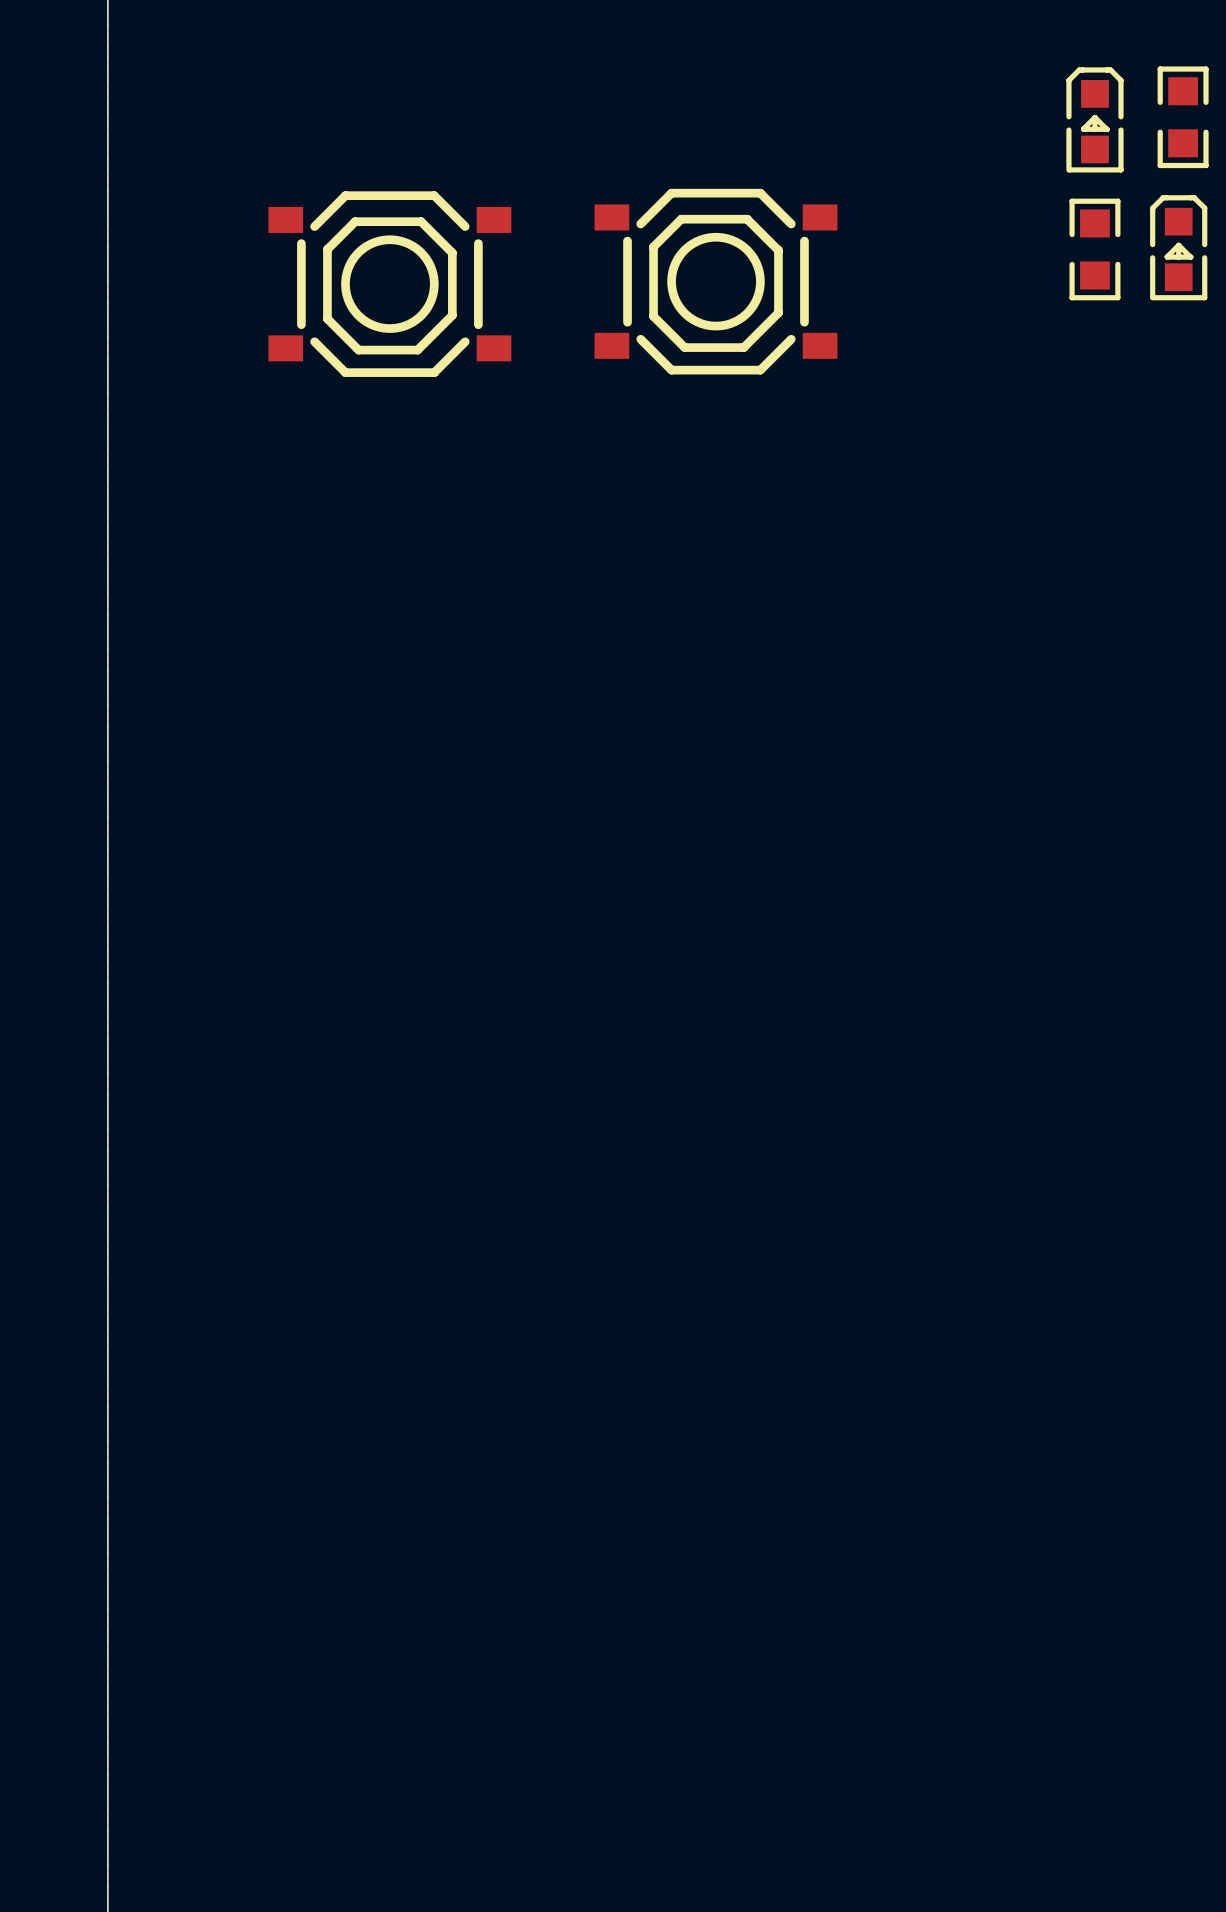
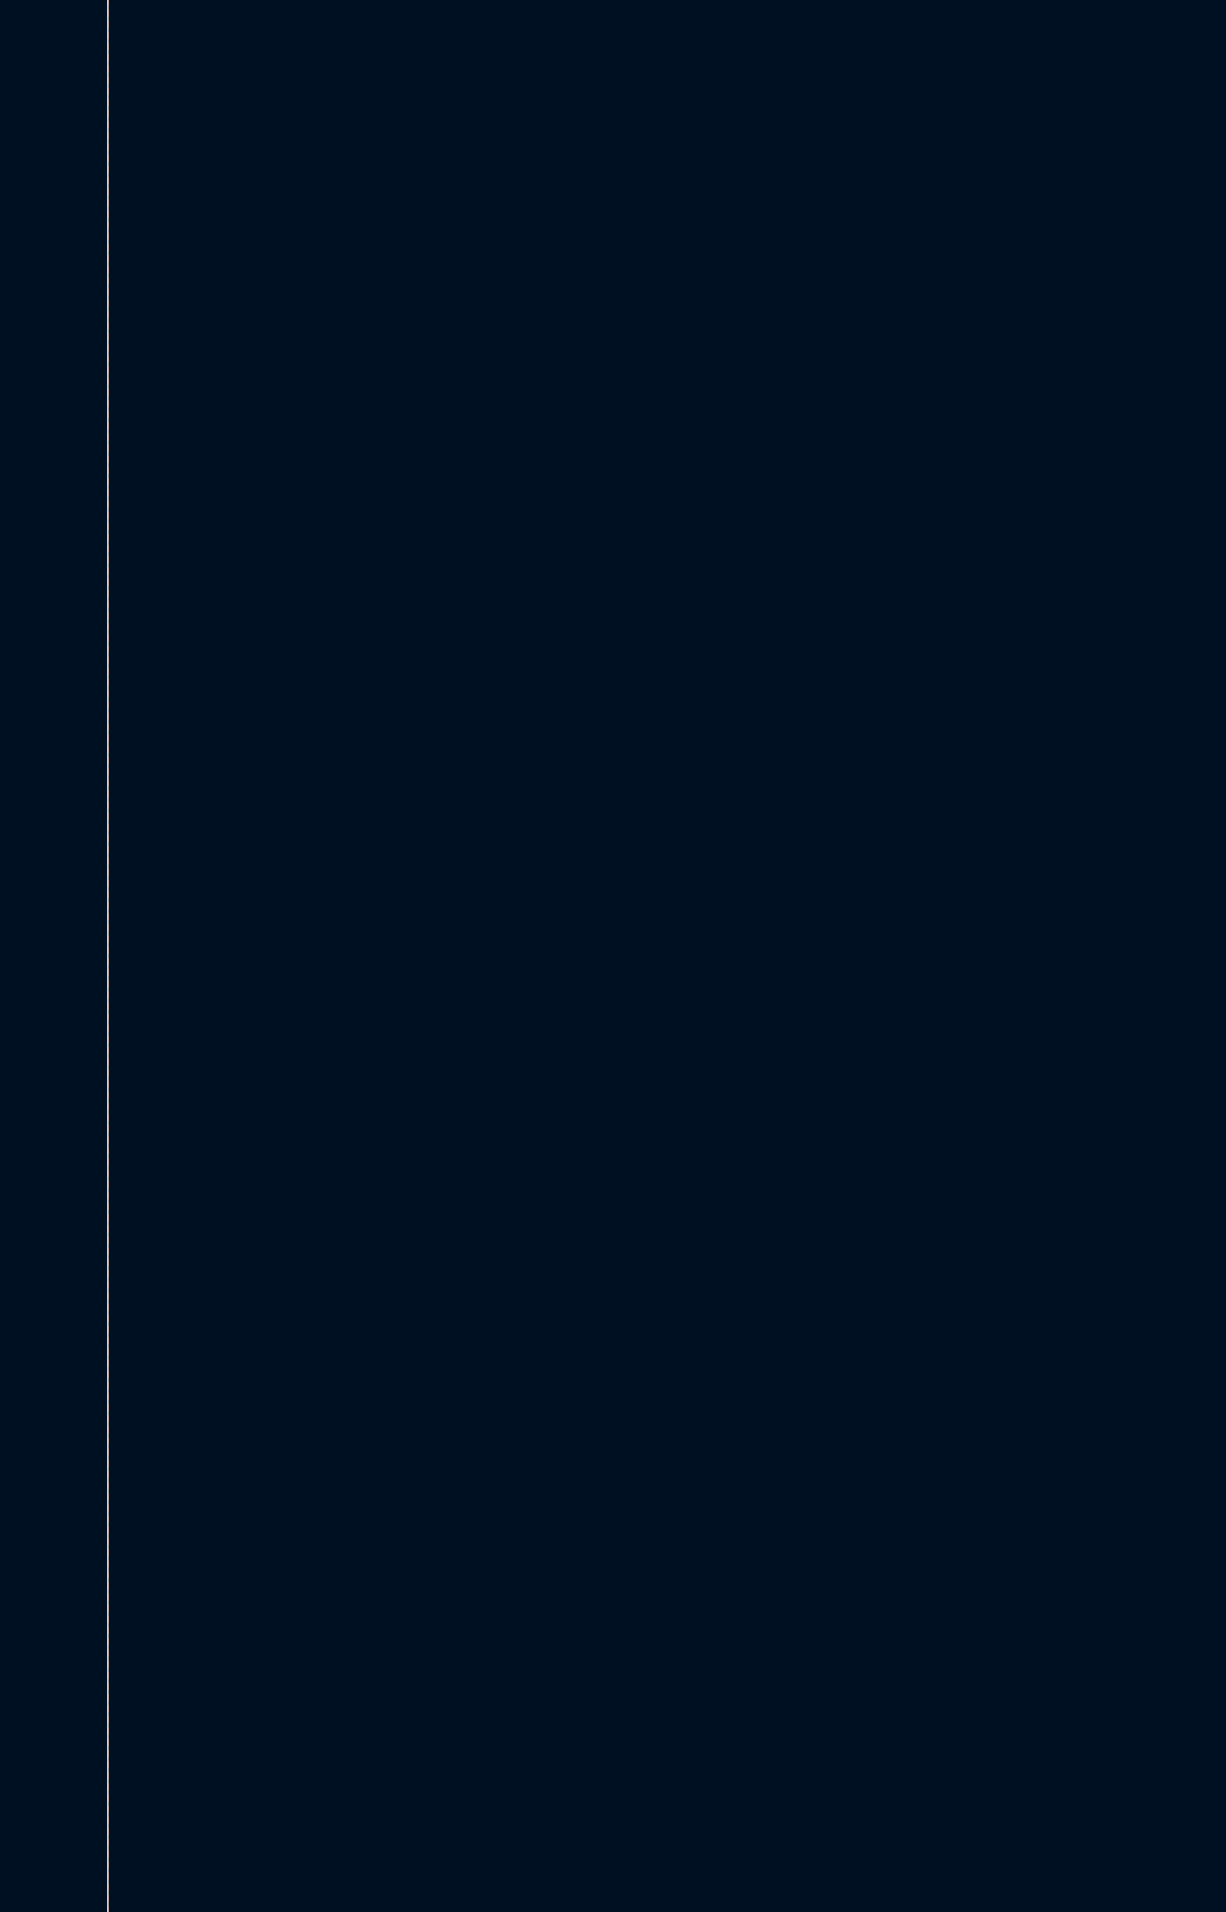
part: (1183, 117) -> none
part: (1094, 119) -> none
part: (1178, 247) -> none
part: (1094, 249) -> none
part: (715, 281) -> none
part: (389, 284) -> none

